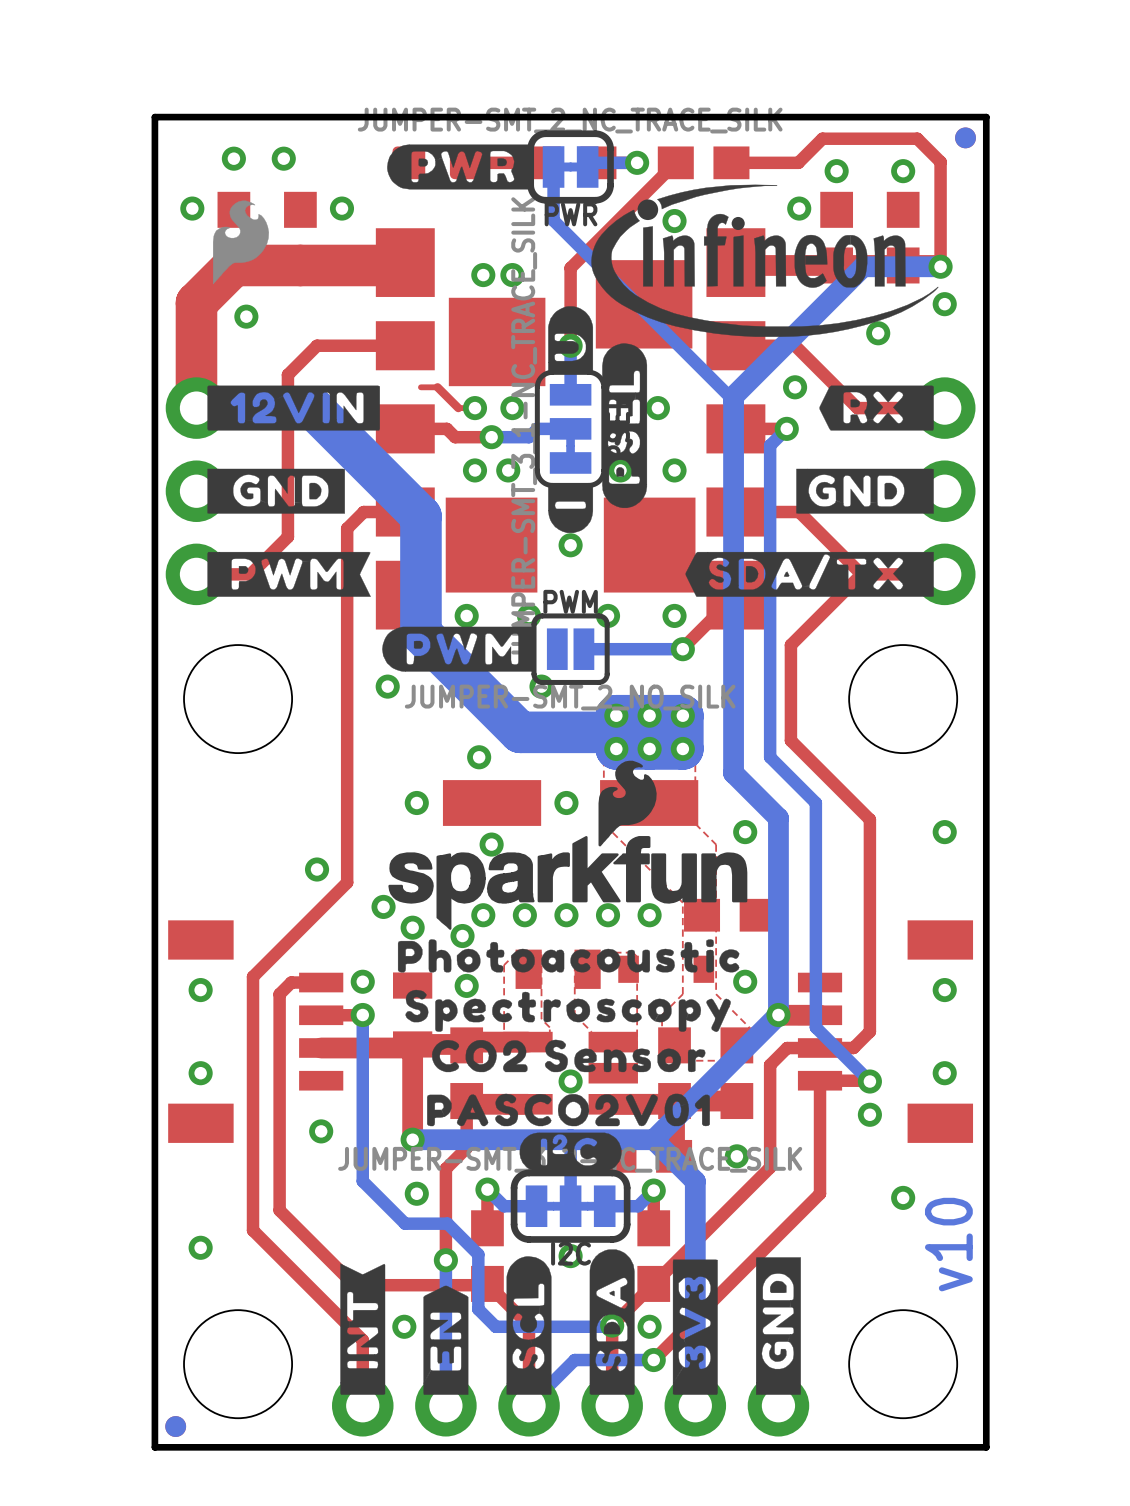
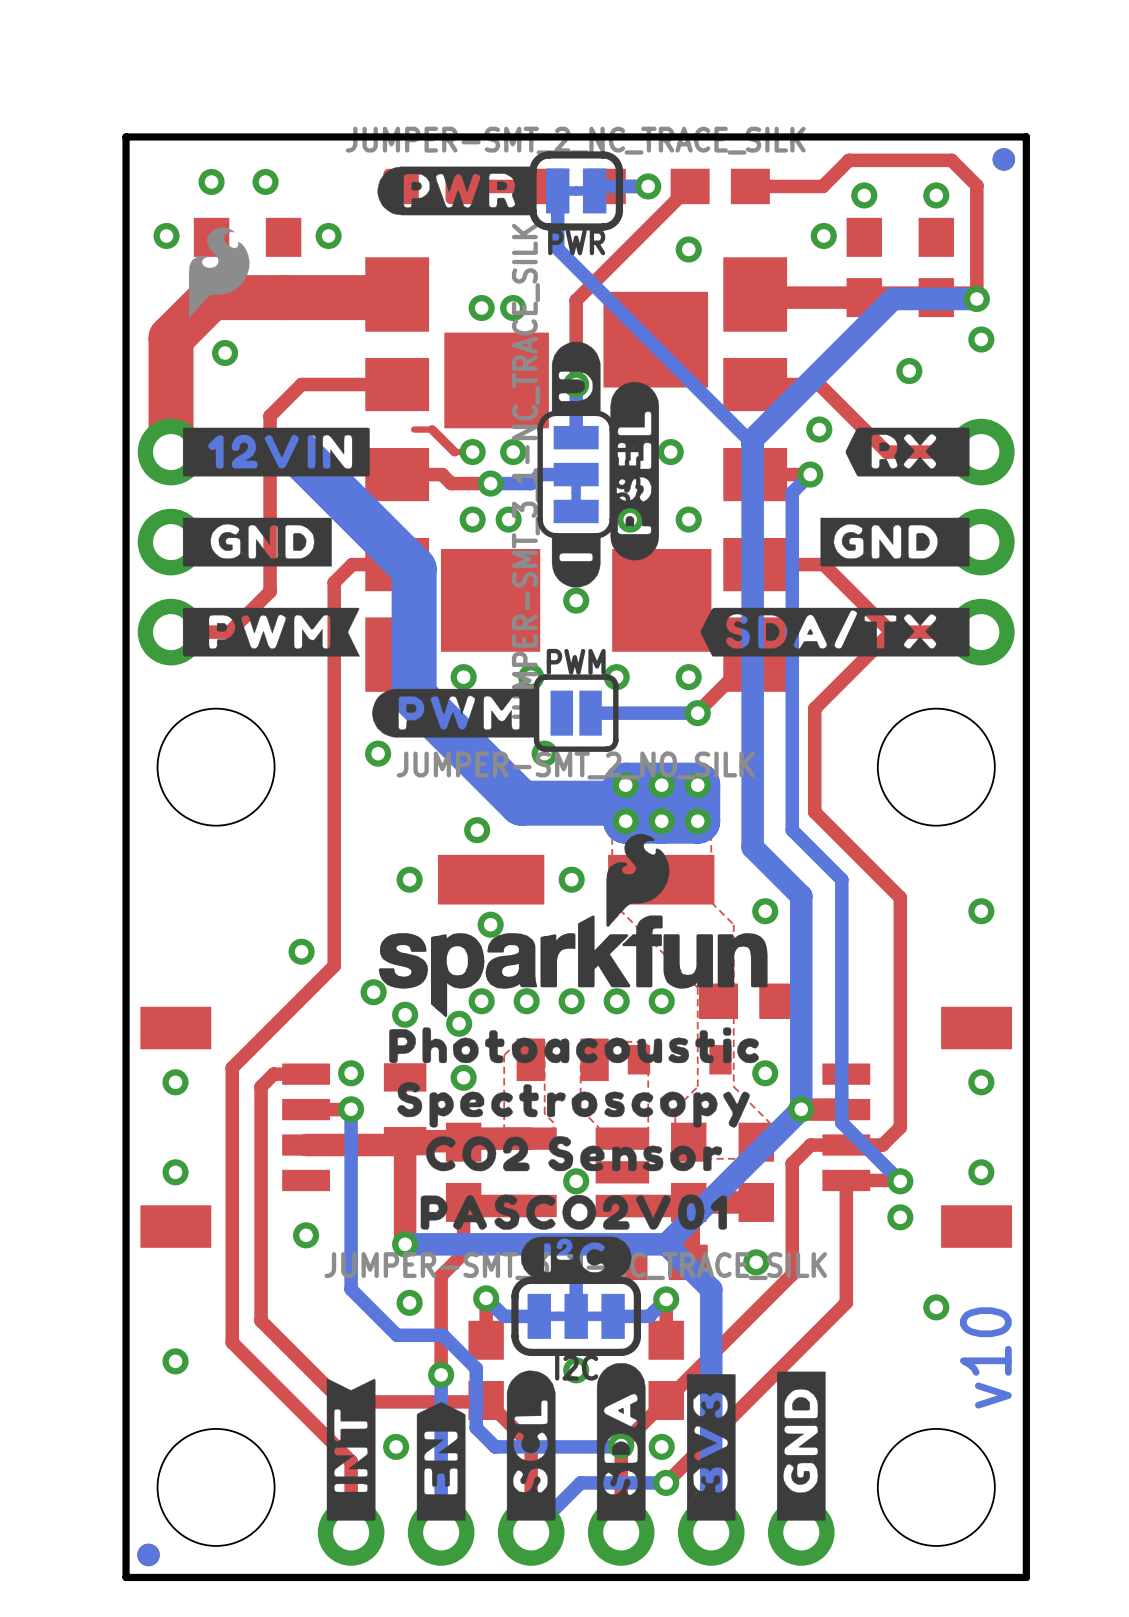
drawing: [591, 184, 939, 337] -> none

